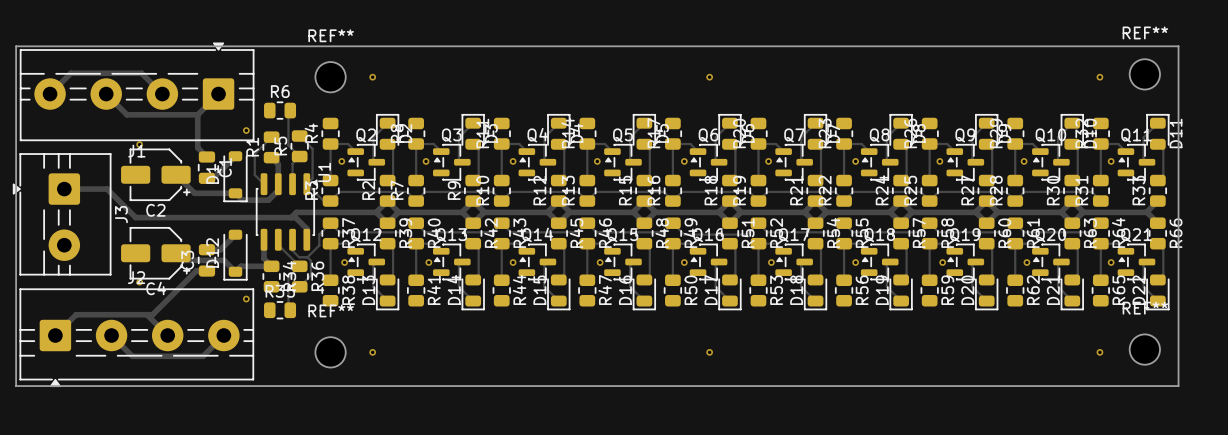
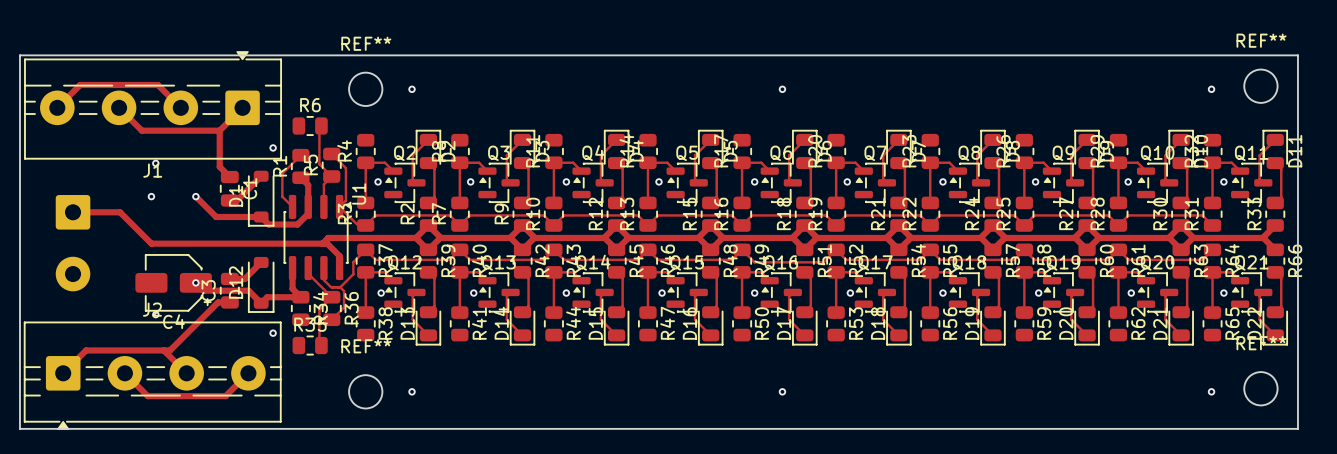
via: none -> (151, 196)
C2: (155, 174) -> none
via: none -> (195, 196)
J3 side: top (62, 214) -> bottom (73, 243)
via: none -> (195, 282)

